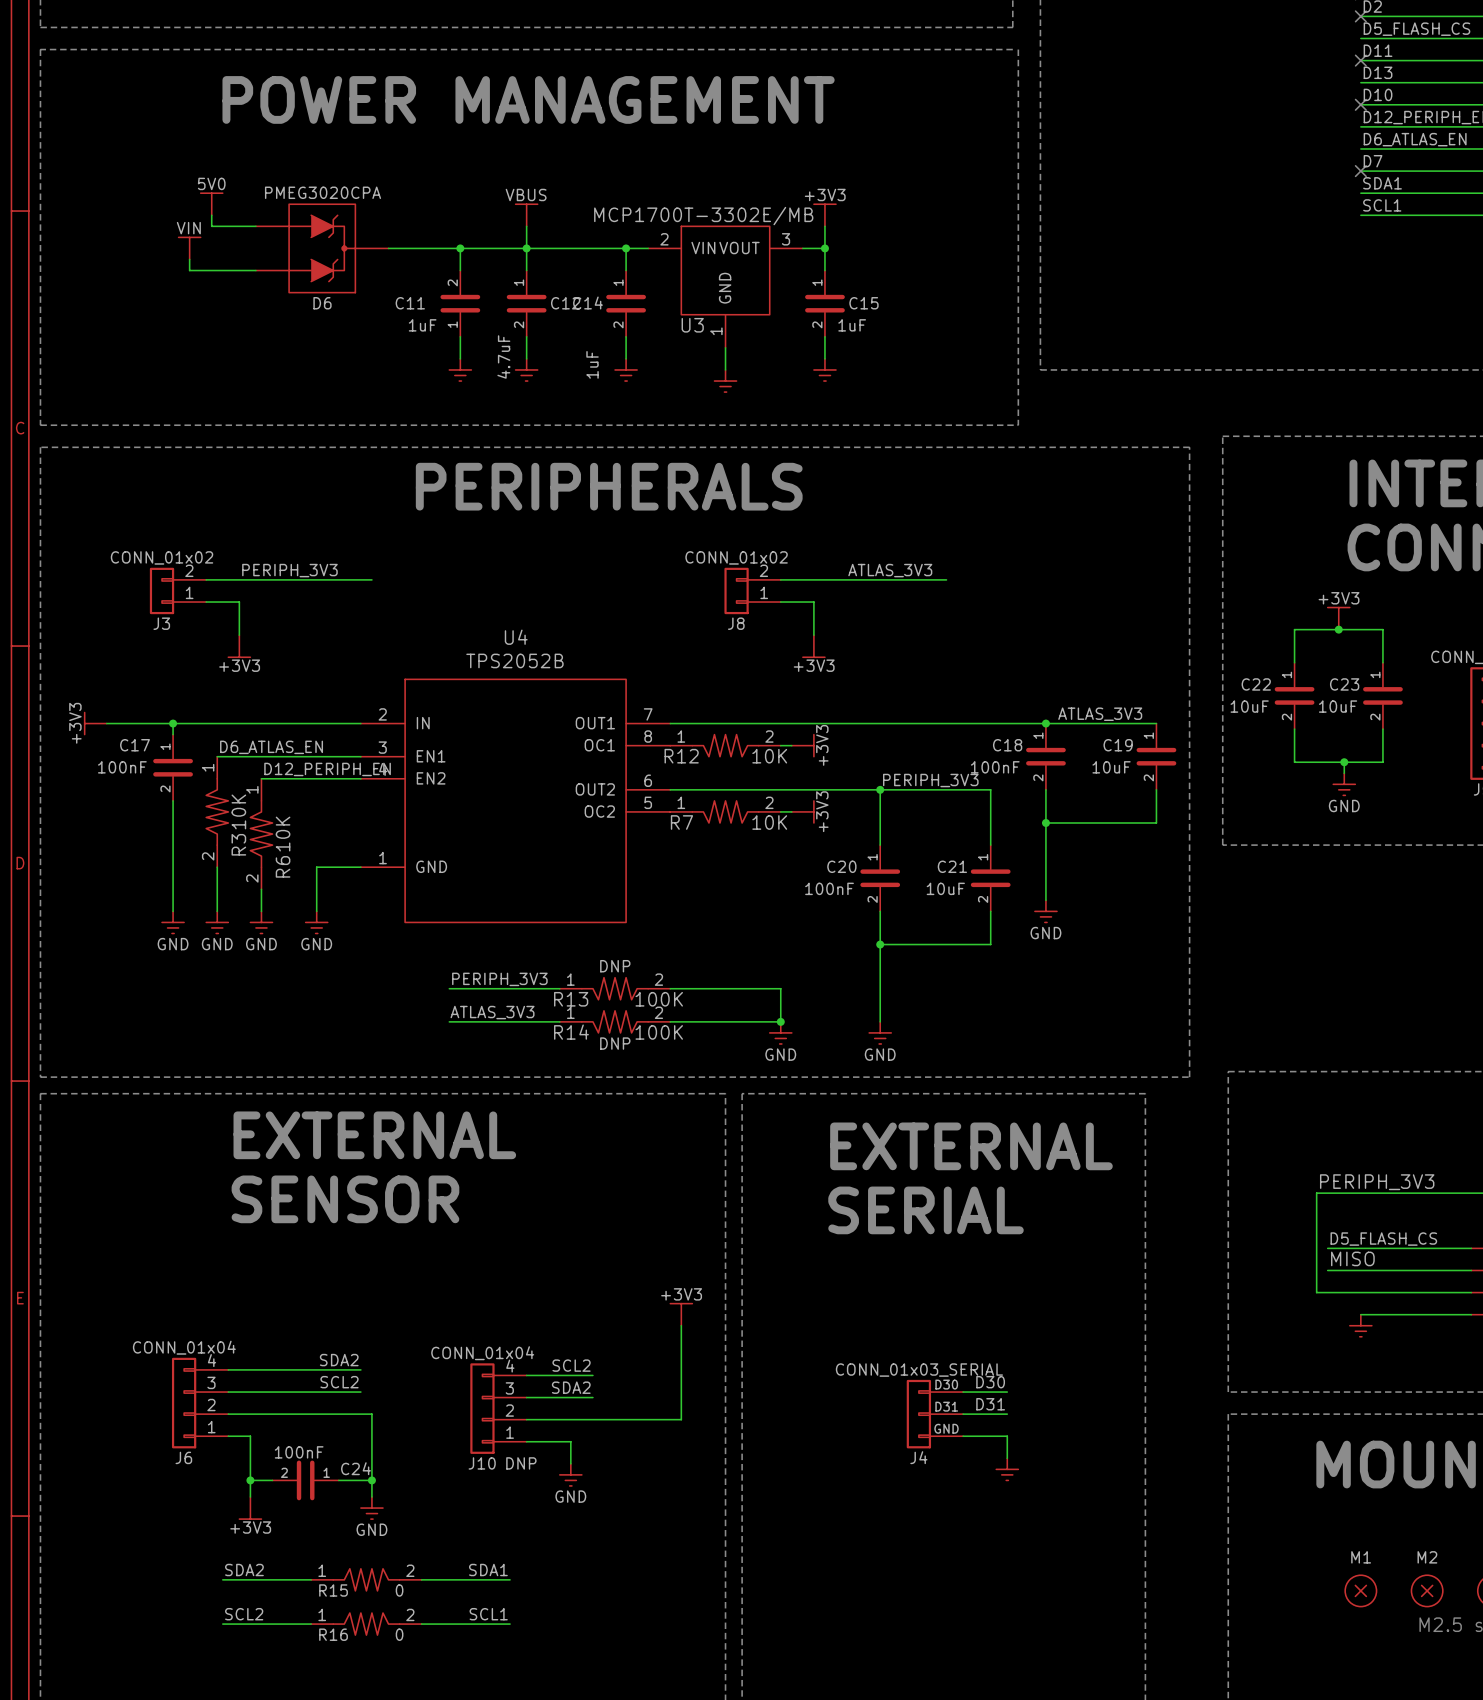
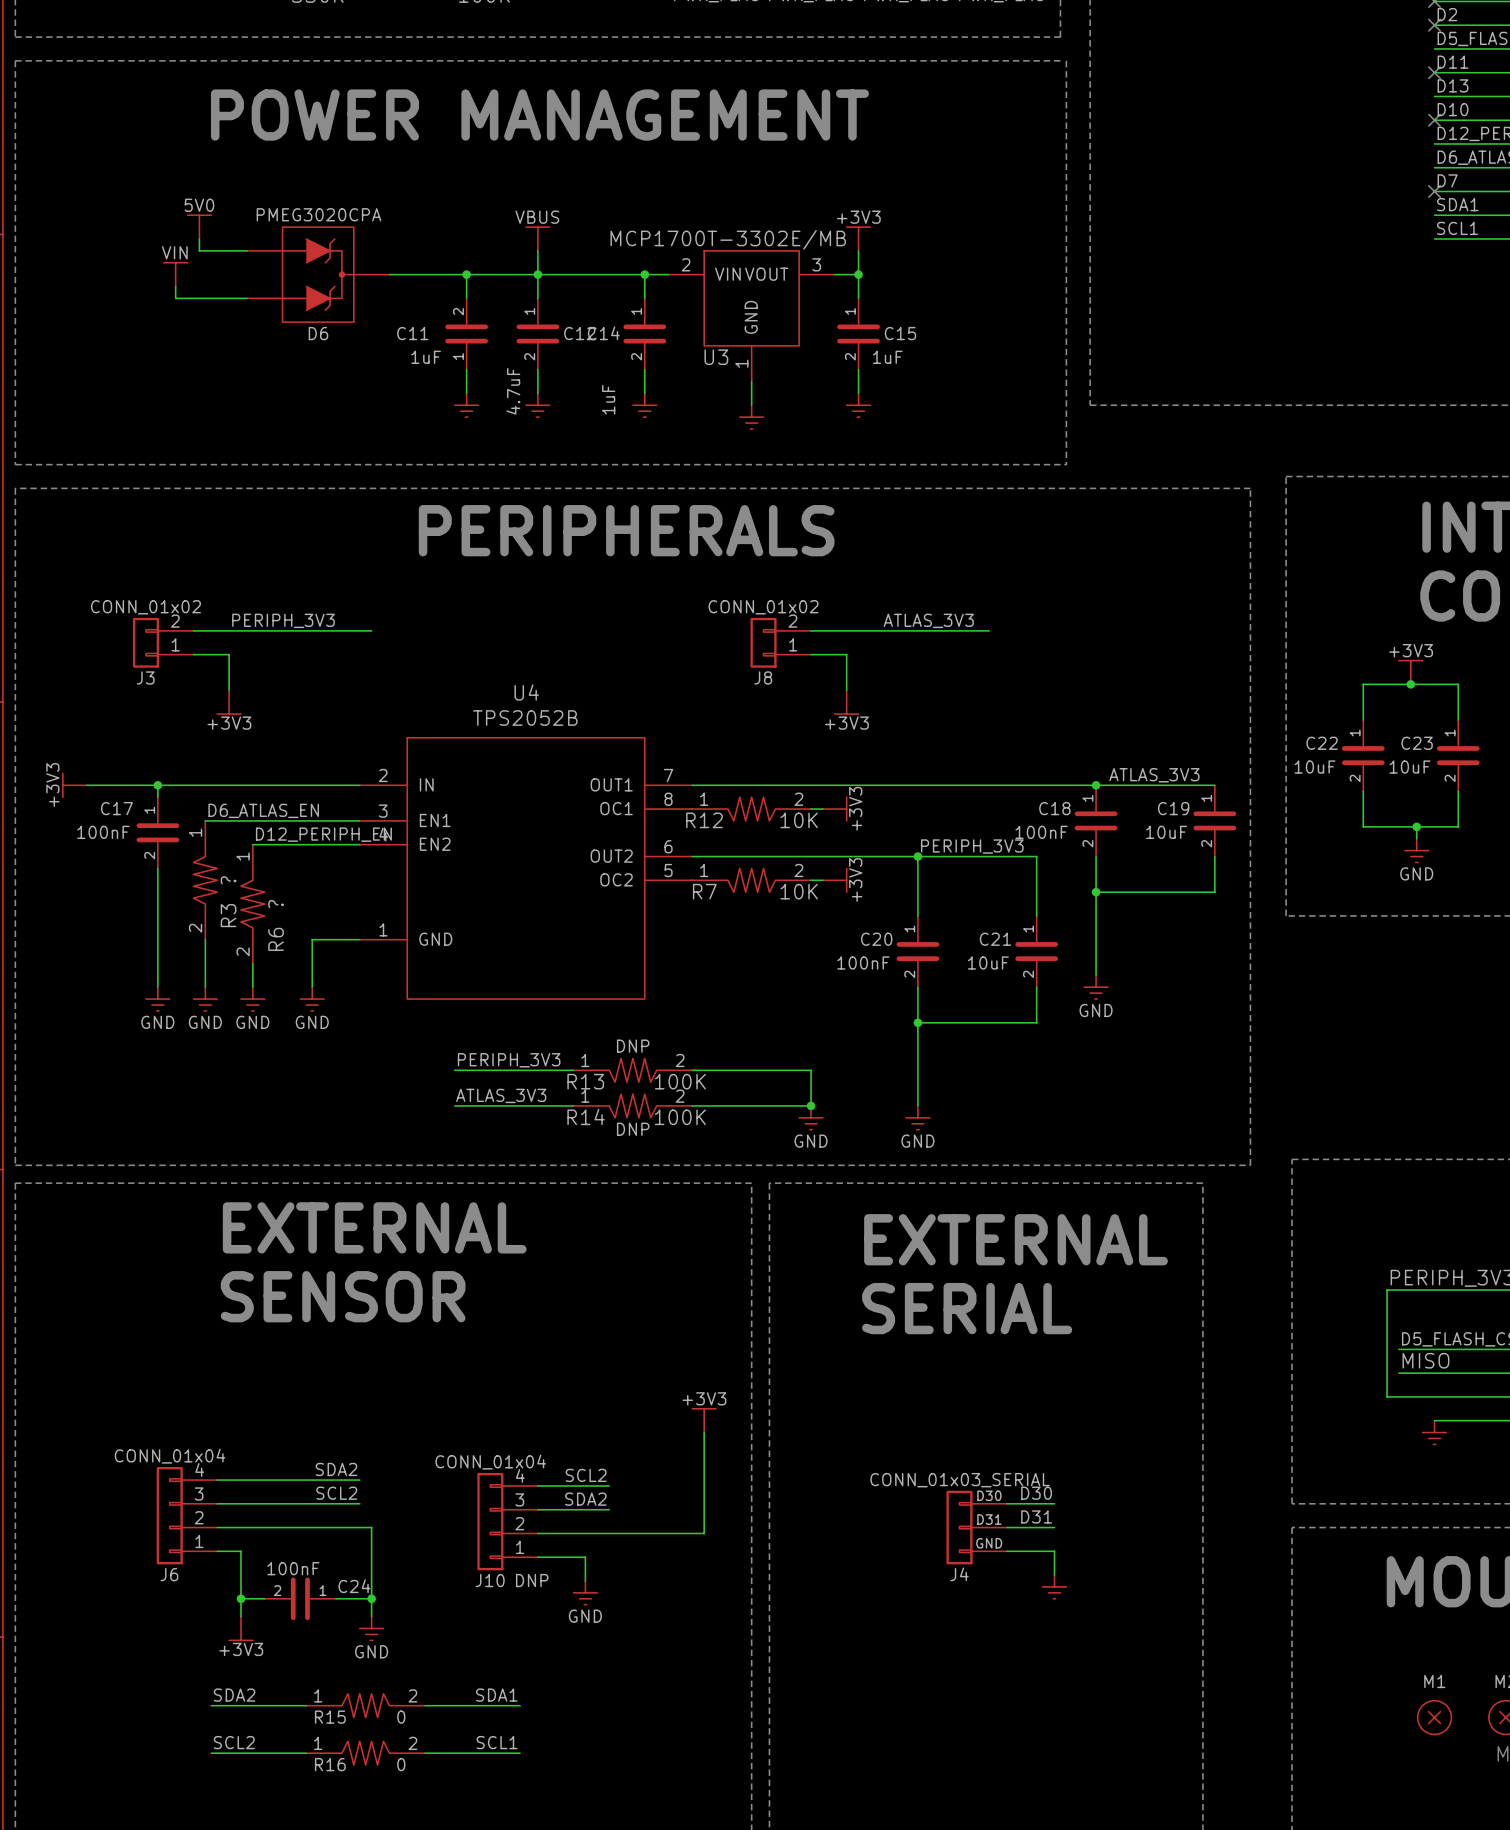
R3 value: 10K (238, 811) -> ? (228, 880)
R6 value: 10K (283, 834) -> ? (276, 904)

